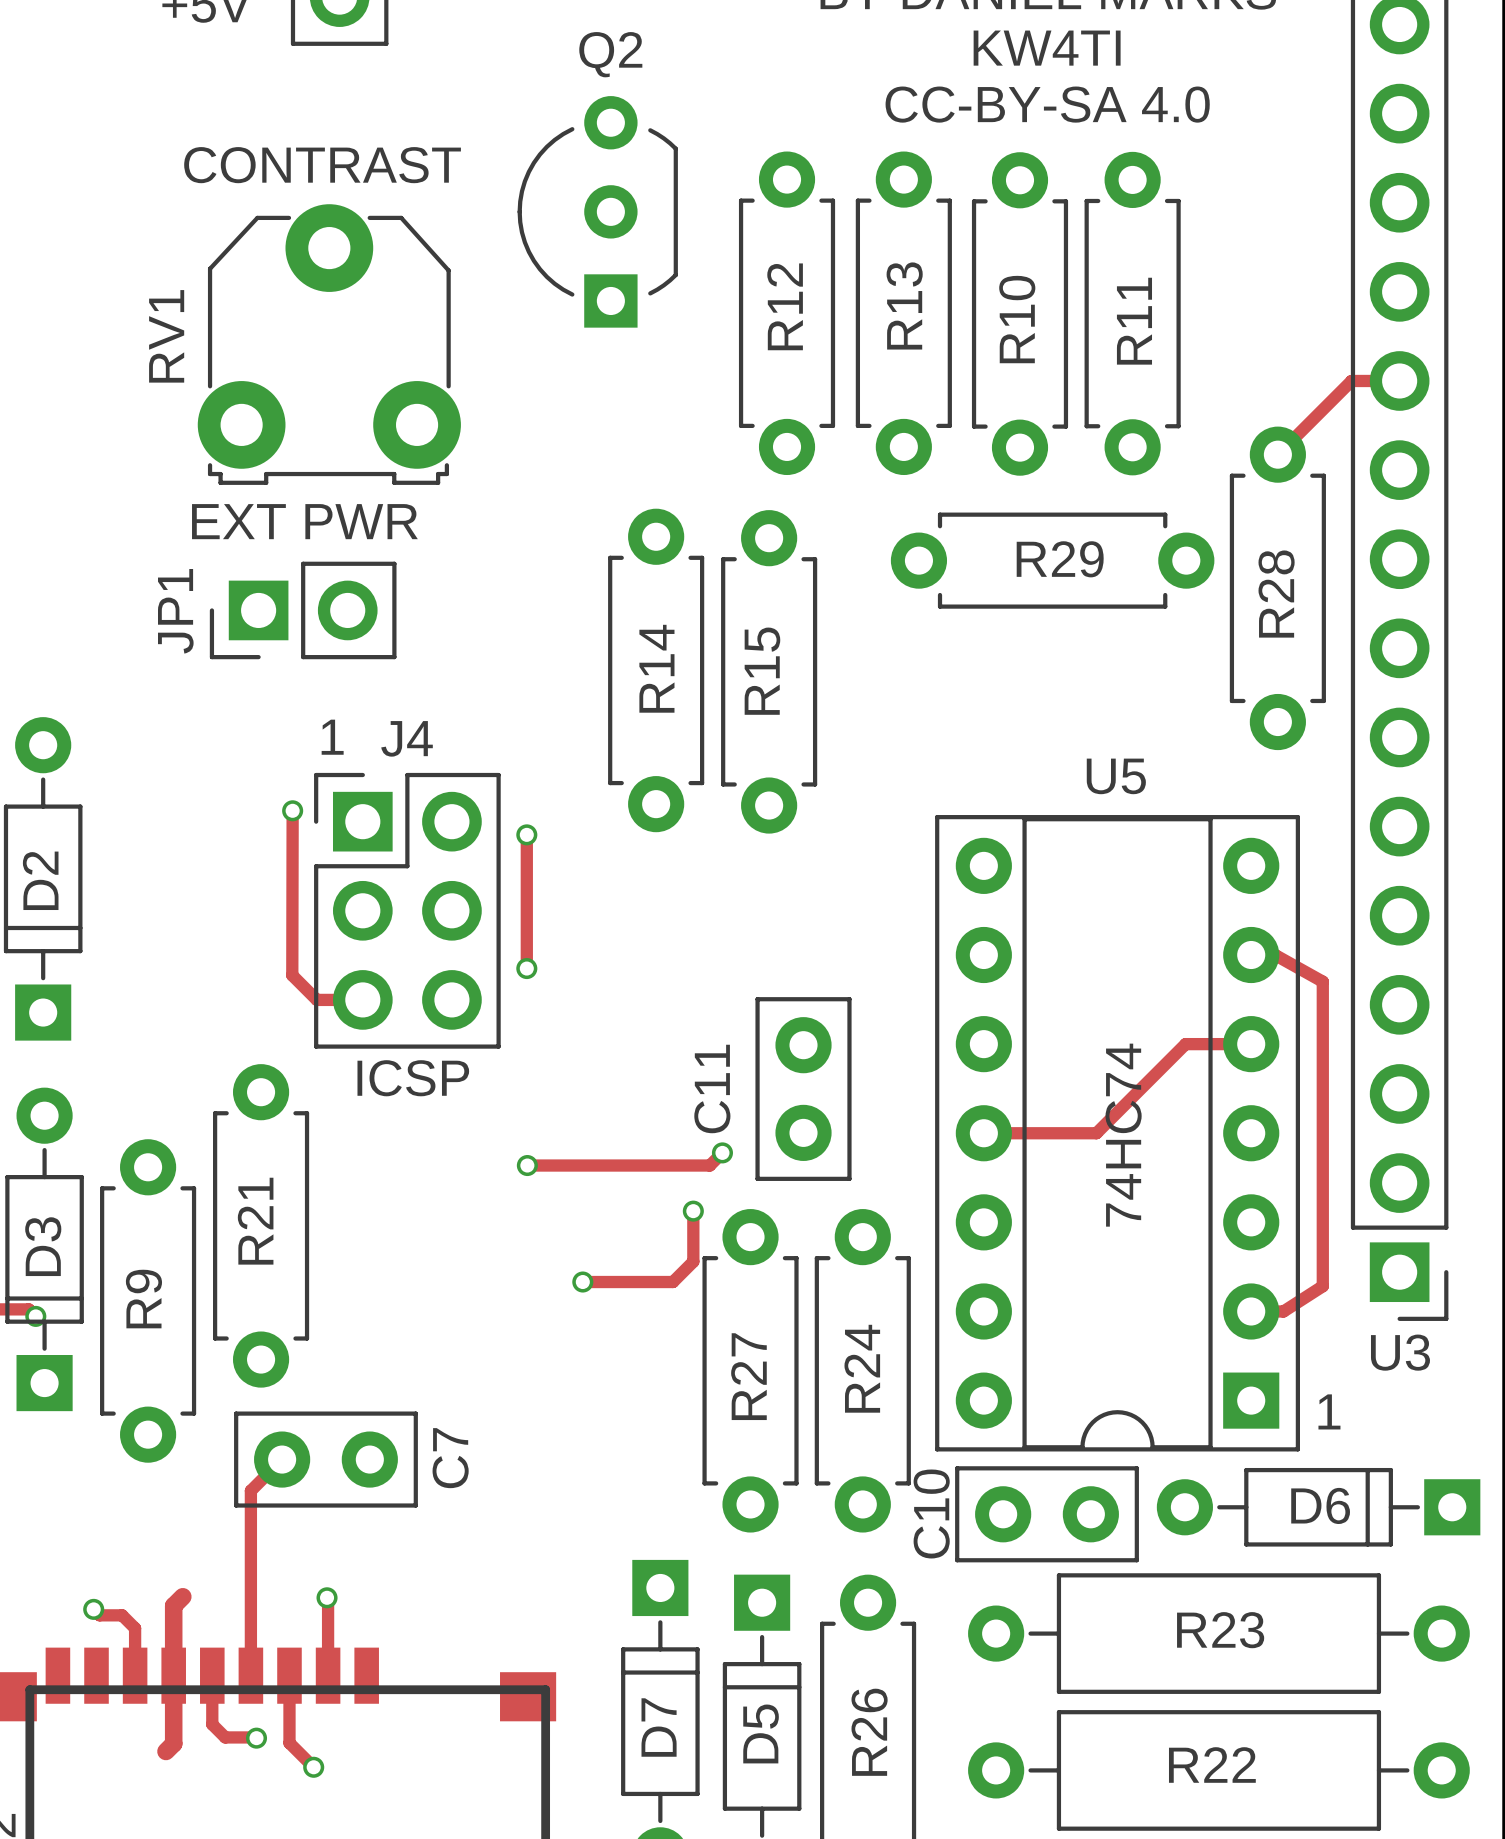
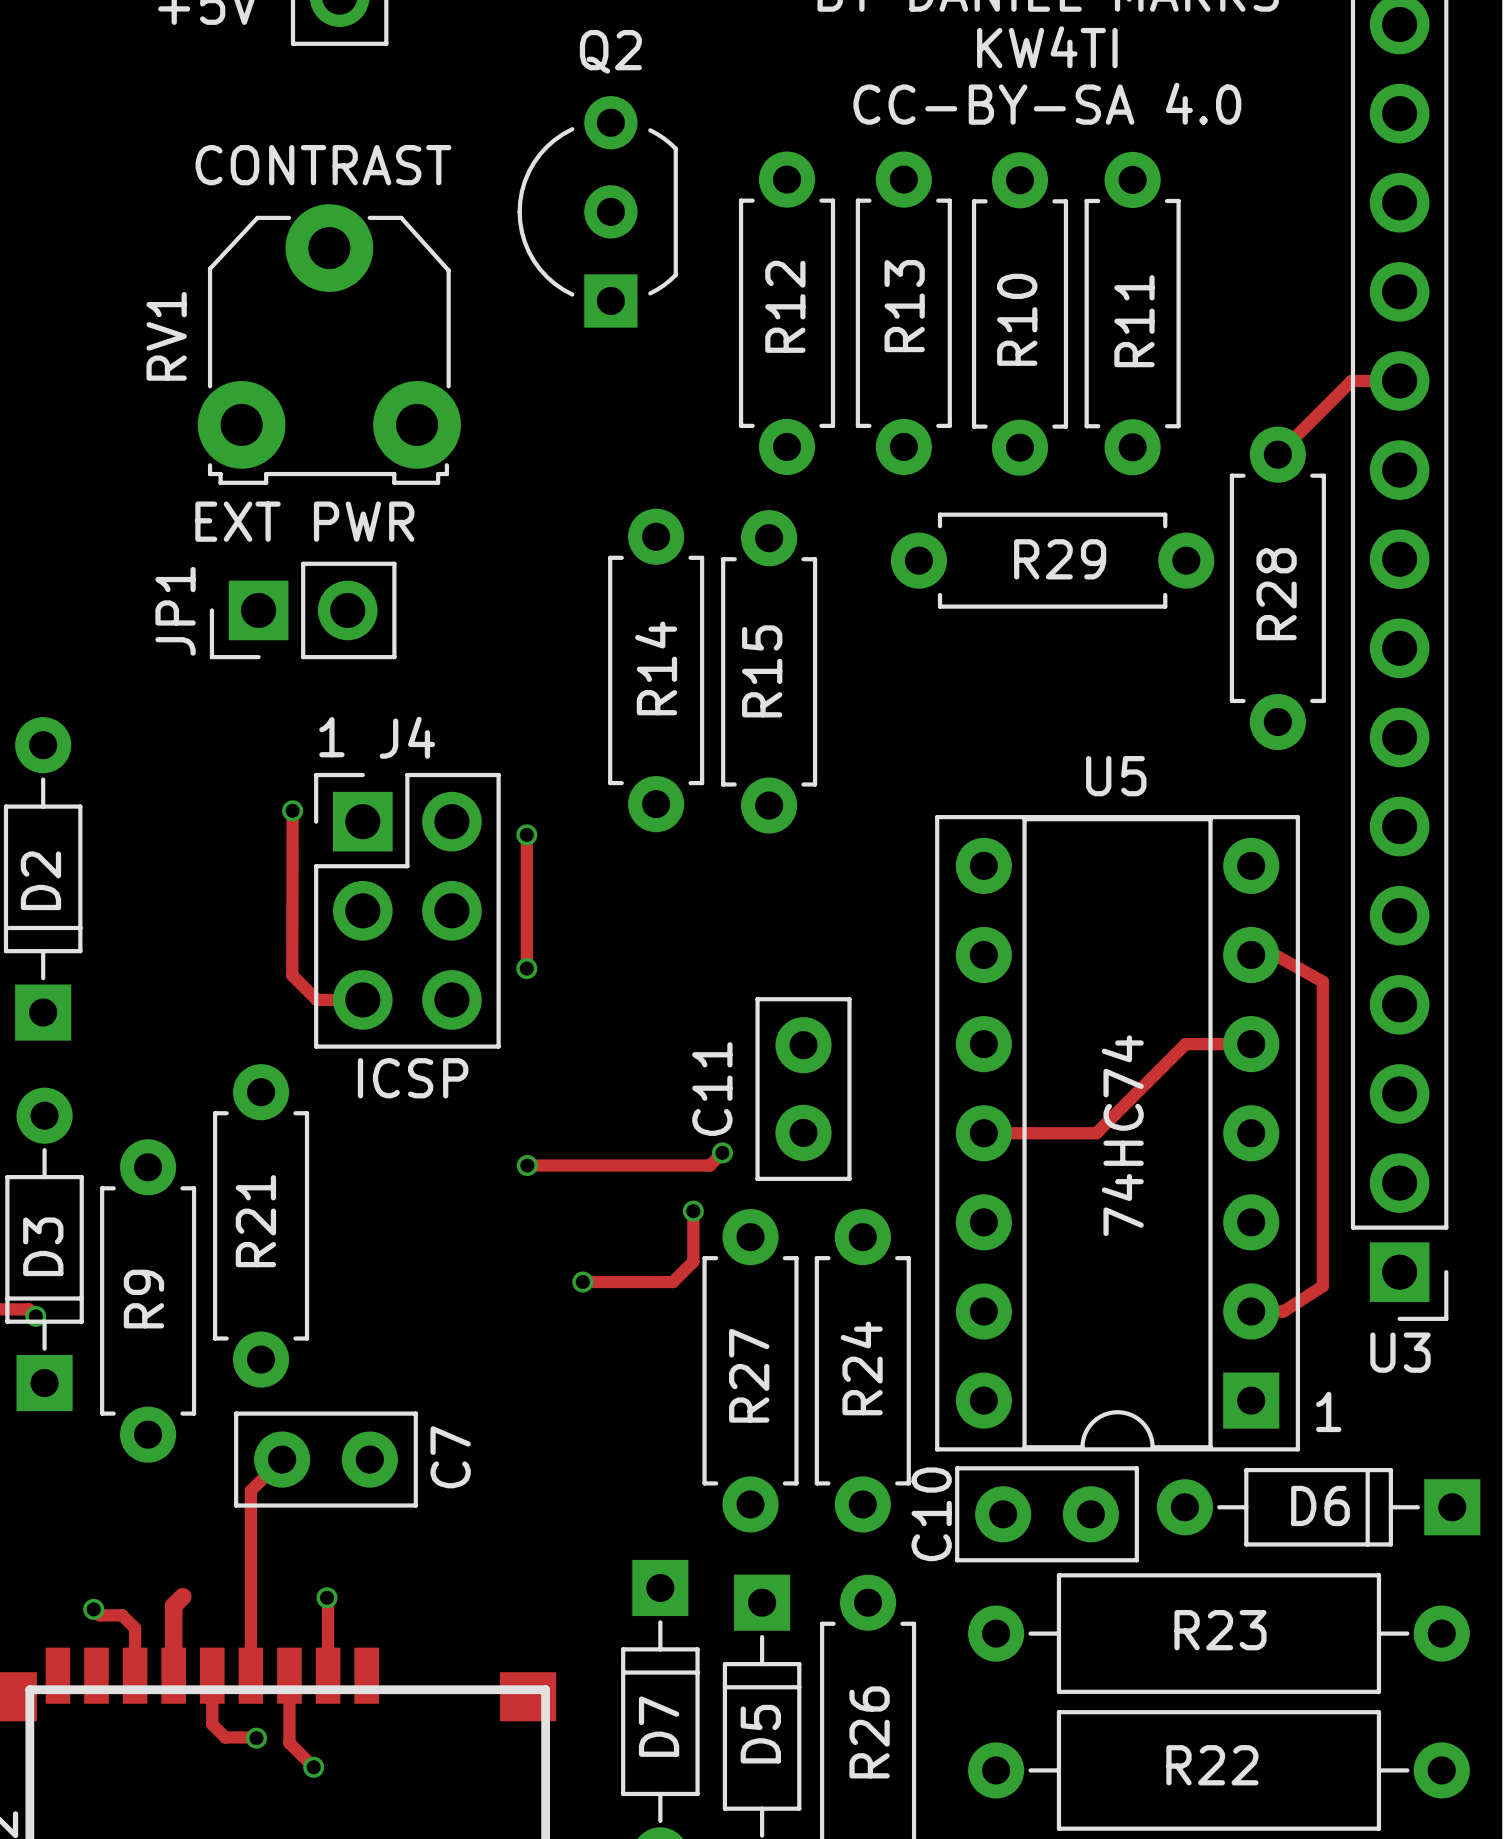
track: (173, 1675) (173, 1743) (165, 1751) -> none

